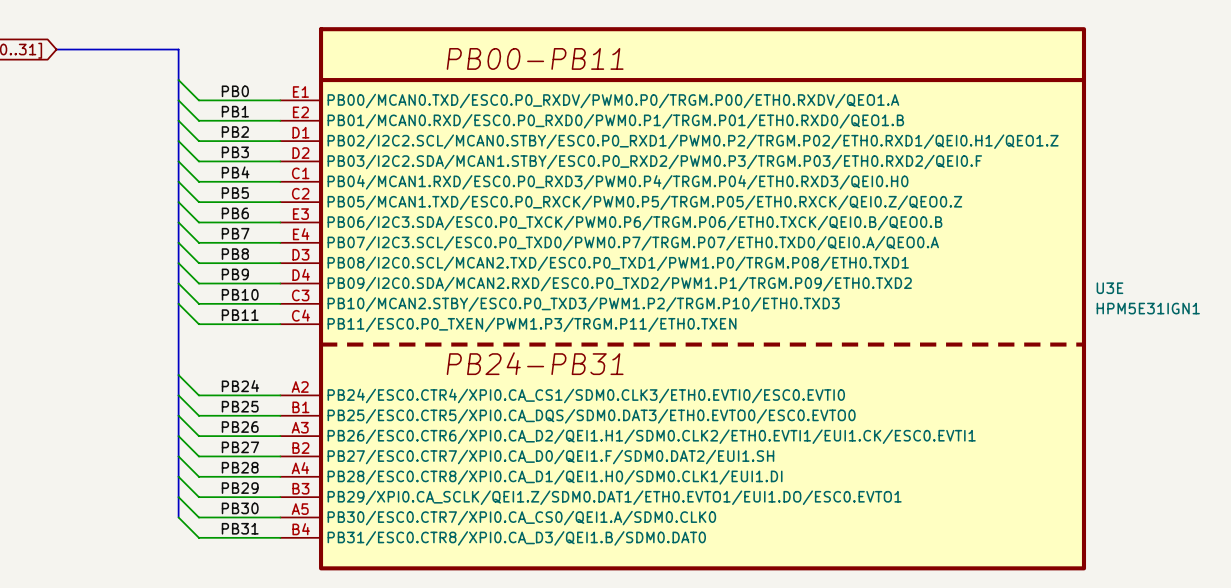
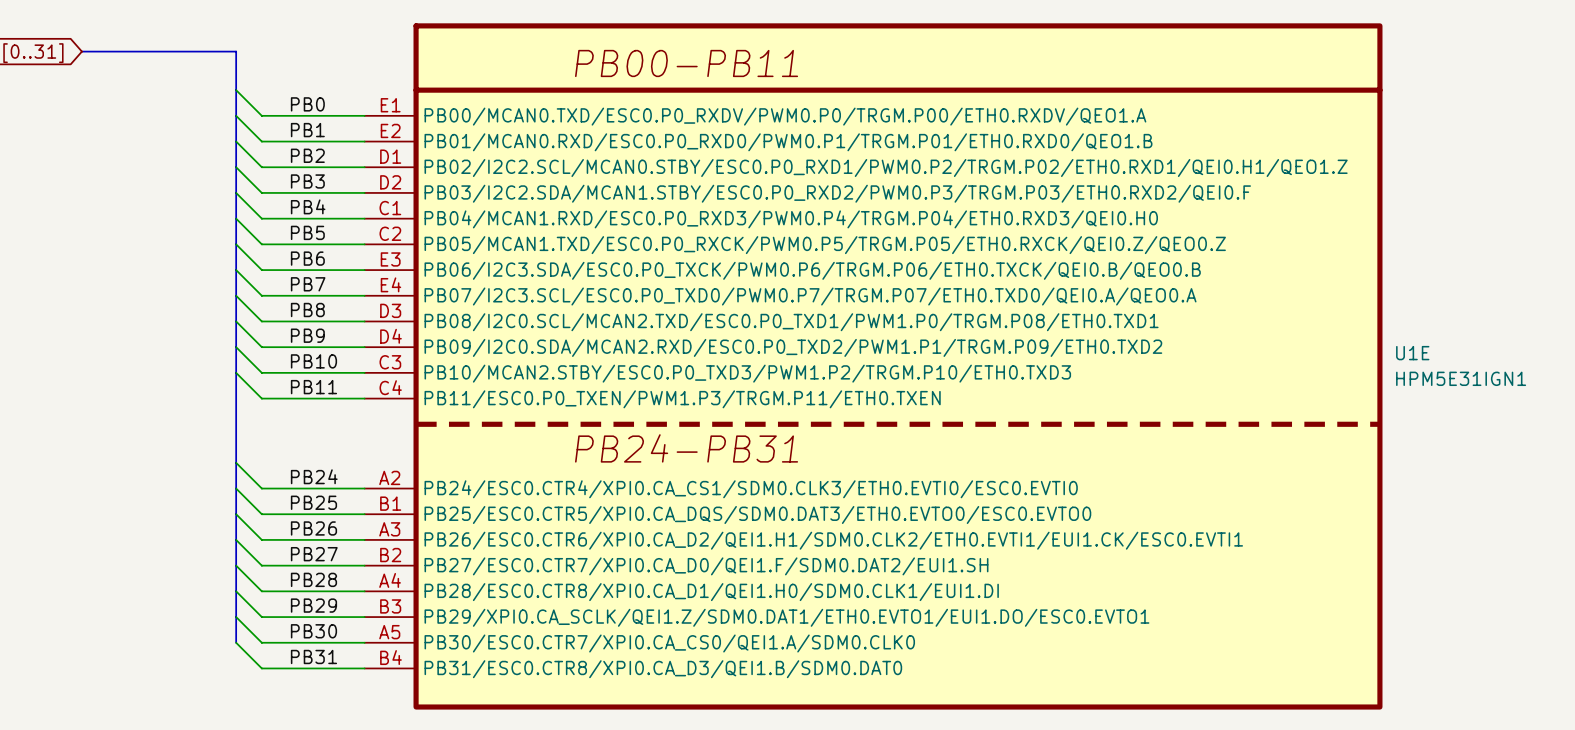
U3E name: U3E (1109, 288) -> U1E (1412, 353)

